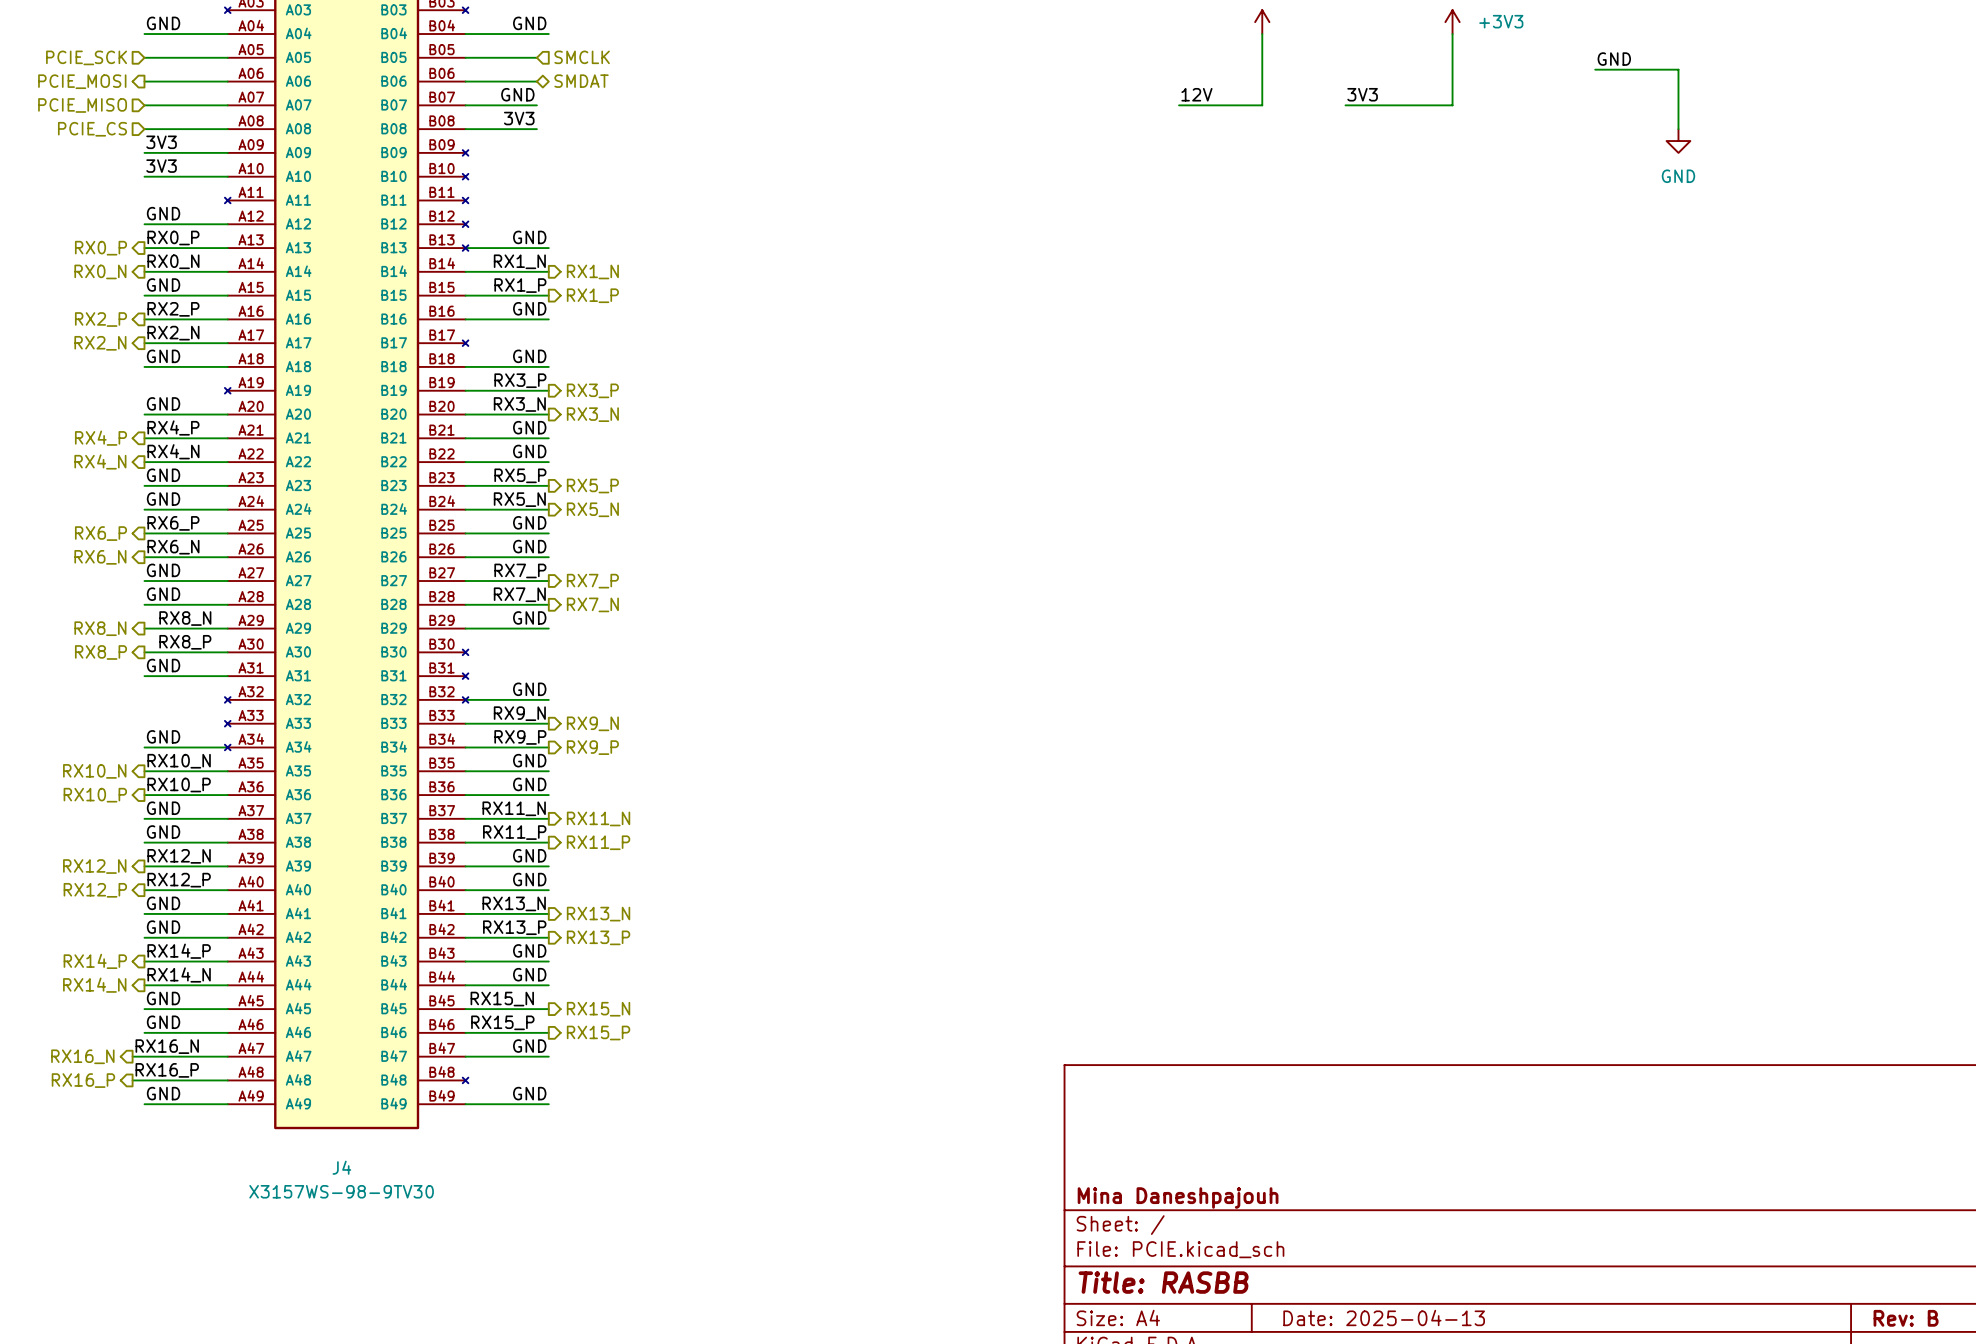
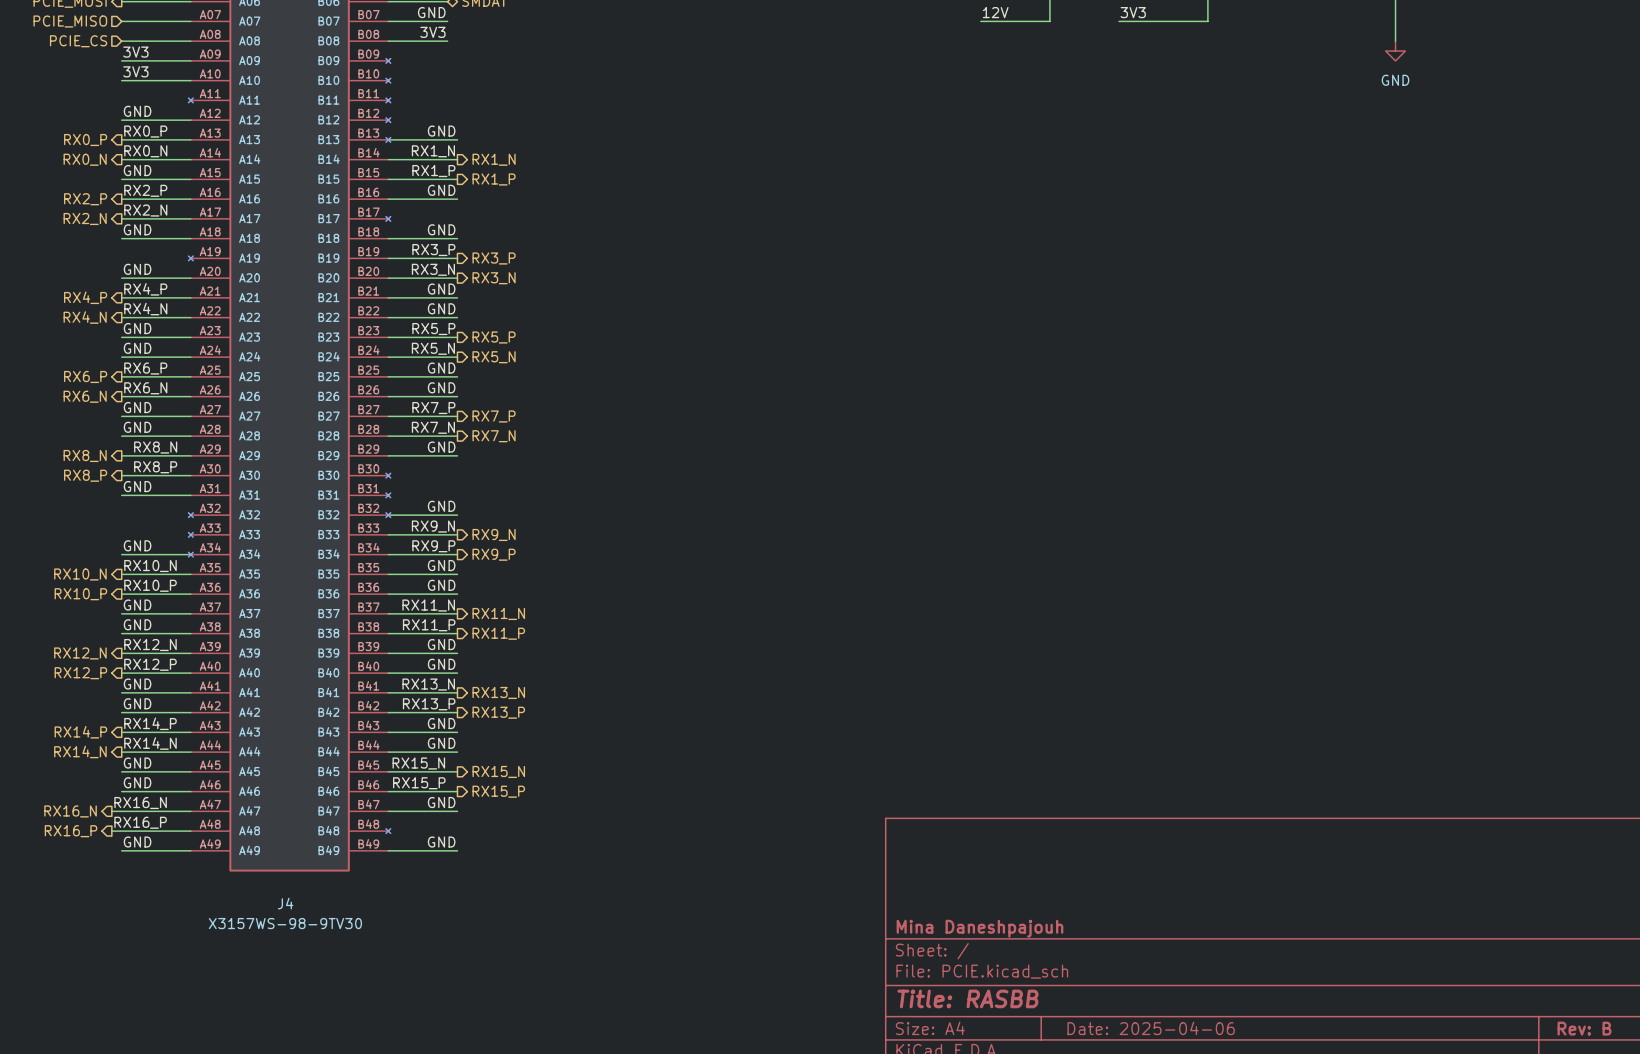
title block: Date: 2025-04-13 (1384, 1317) -> Date: 2025-04-06 (1151, 1028)

